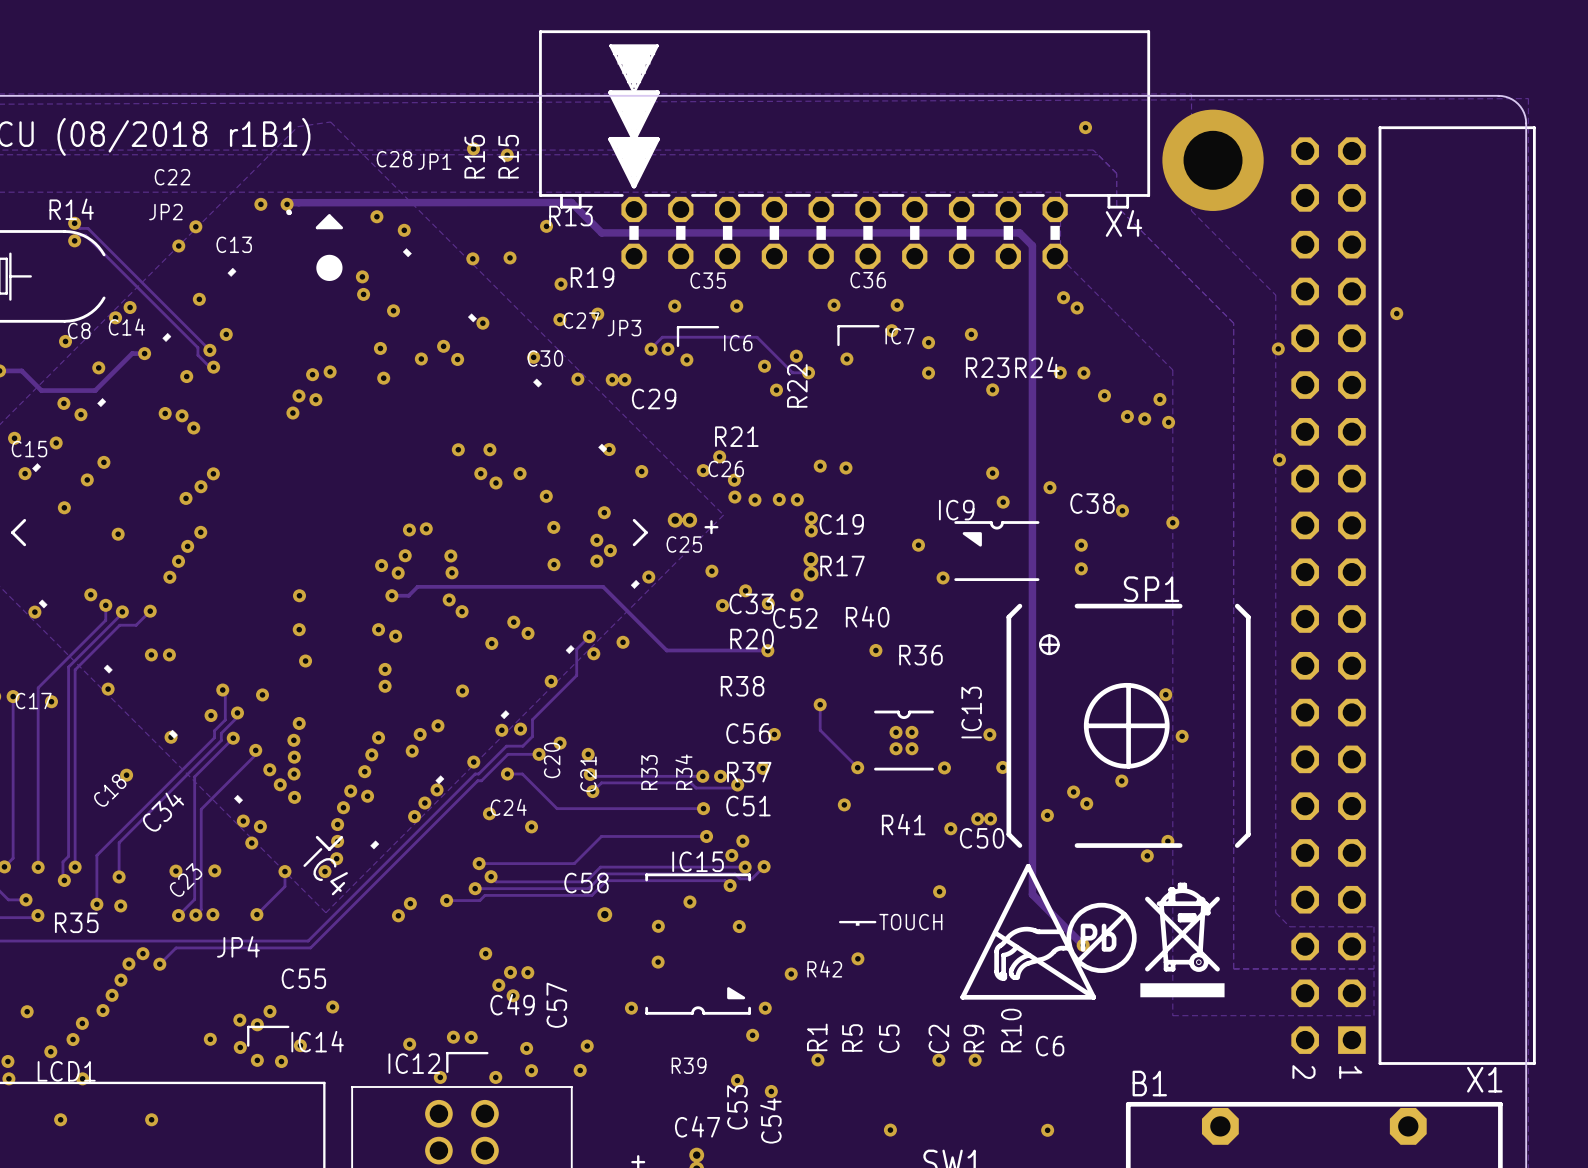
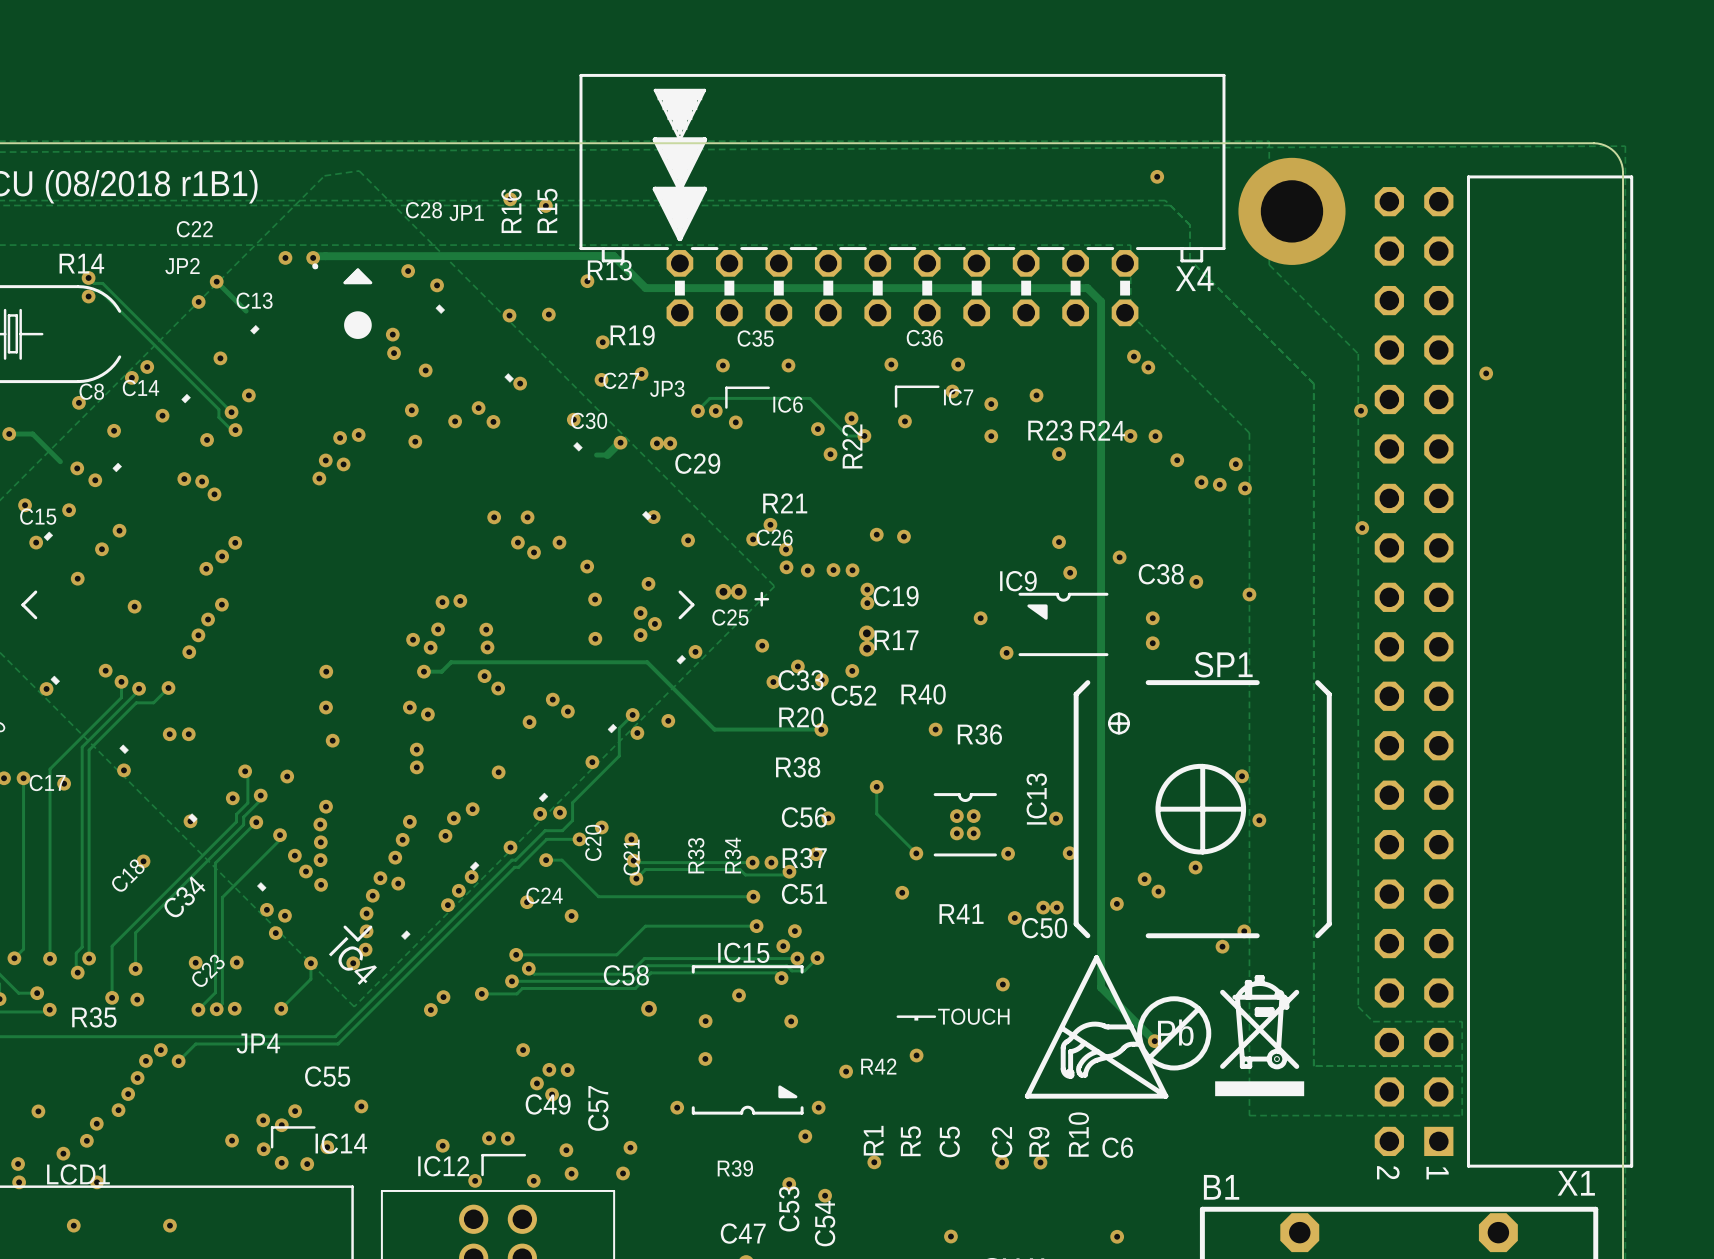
track: none -> (216, 281) (246, 311)
track: (144, 353) (132, 353) (95, 390) (41, 390) -> (60, 461) (53, 454)
track: none -> (620, 442) (607, 455) (596, 455)

